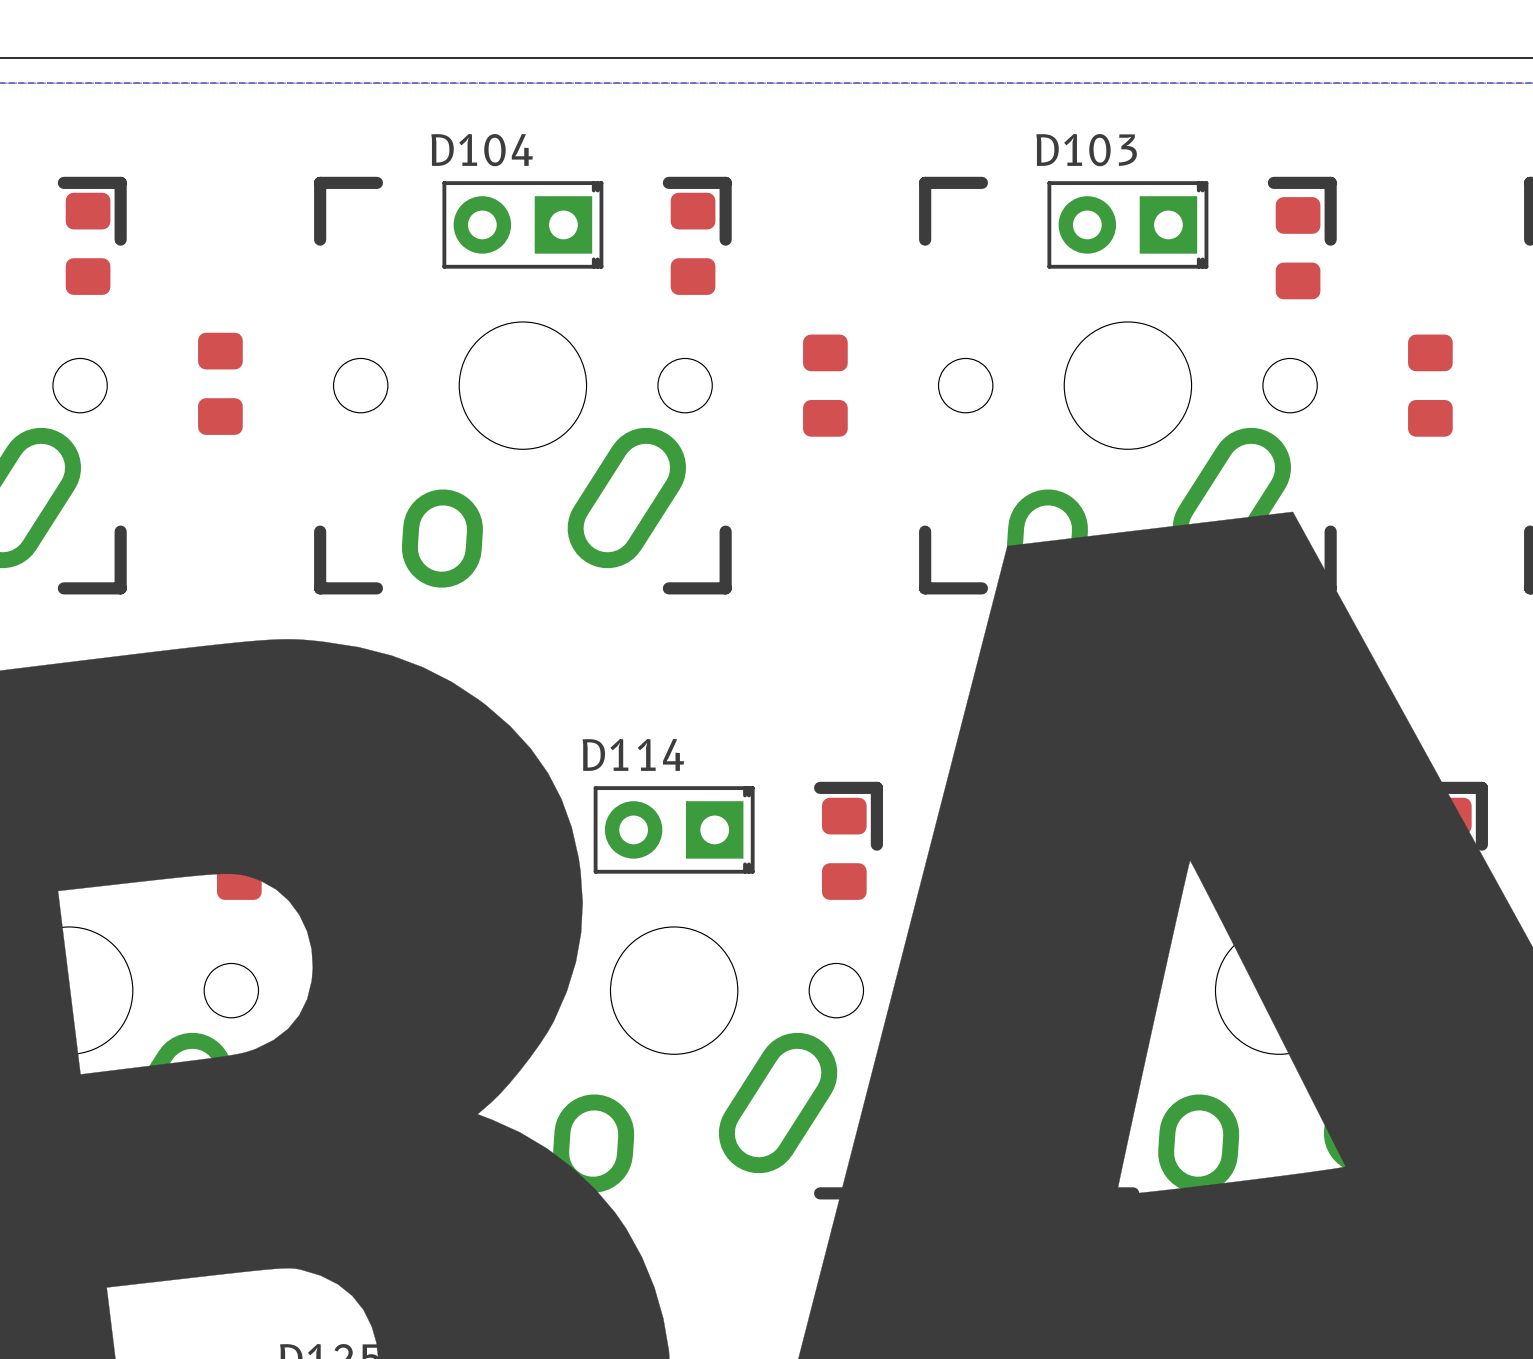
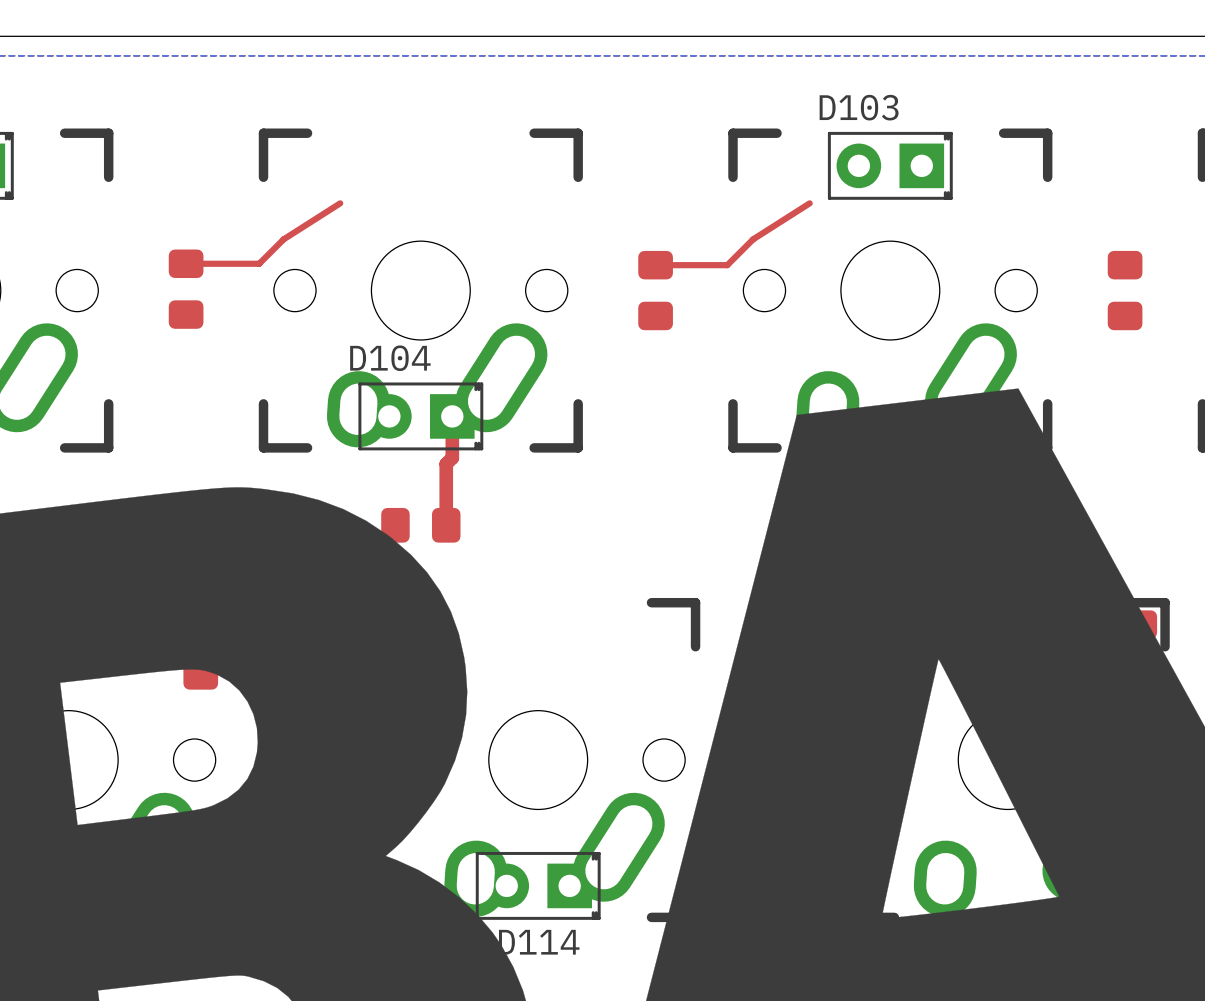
D104 position: (522, 224) -> (420, 416)
part: (88, 243) -> none
part: (693, 243) -> none
part: (1298, 248) -> none
top track: none -> (340, 203) (283, 239) (259, 263) (186, 263)
top track: none -> (809, 203) (753, 239) (727, 265) (655, 265)
top track: none -> (452, 416) (452, 457) (446, 464) (446, 525)
part: none -> (420, 525)
D114 name position: D114 (633, 754) -> D114 (539, 942)
D114 position: (674, 829) -> (538, 885)
part: (844, 848) -> none

